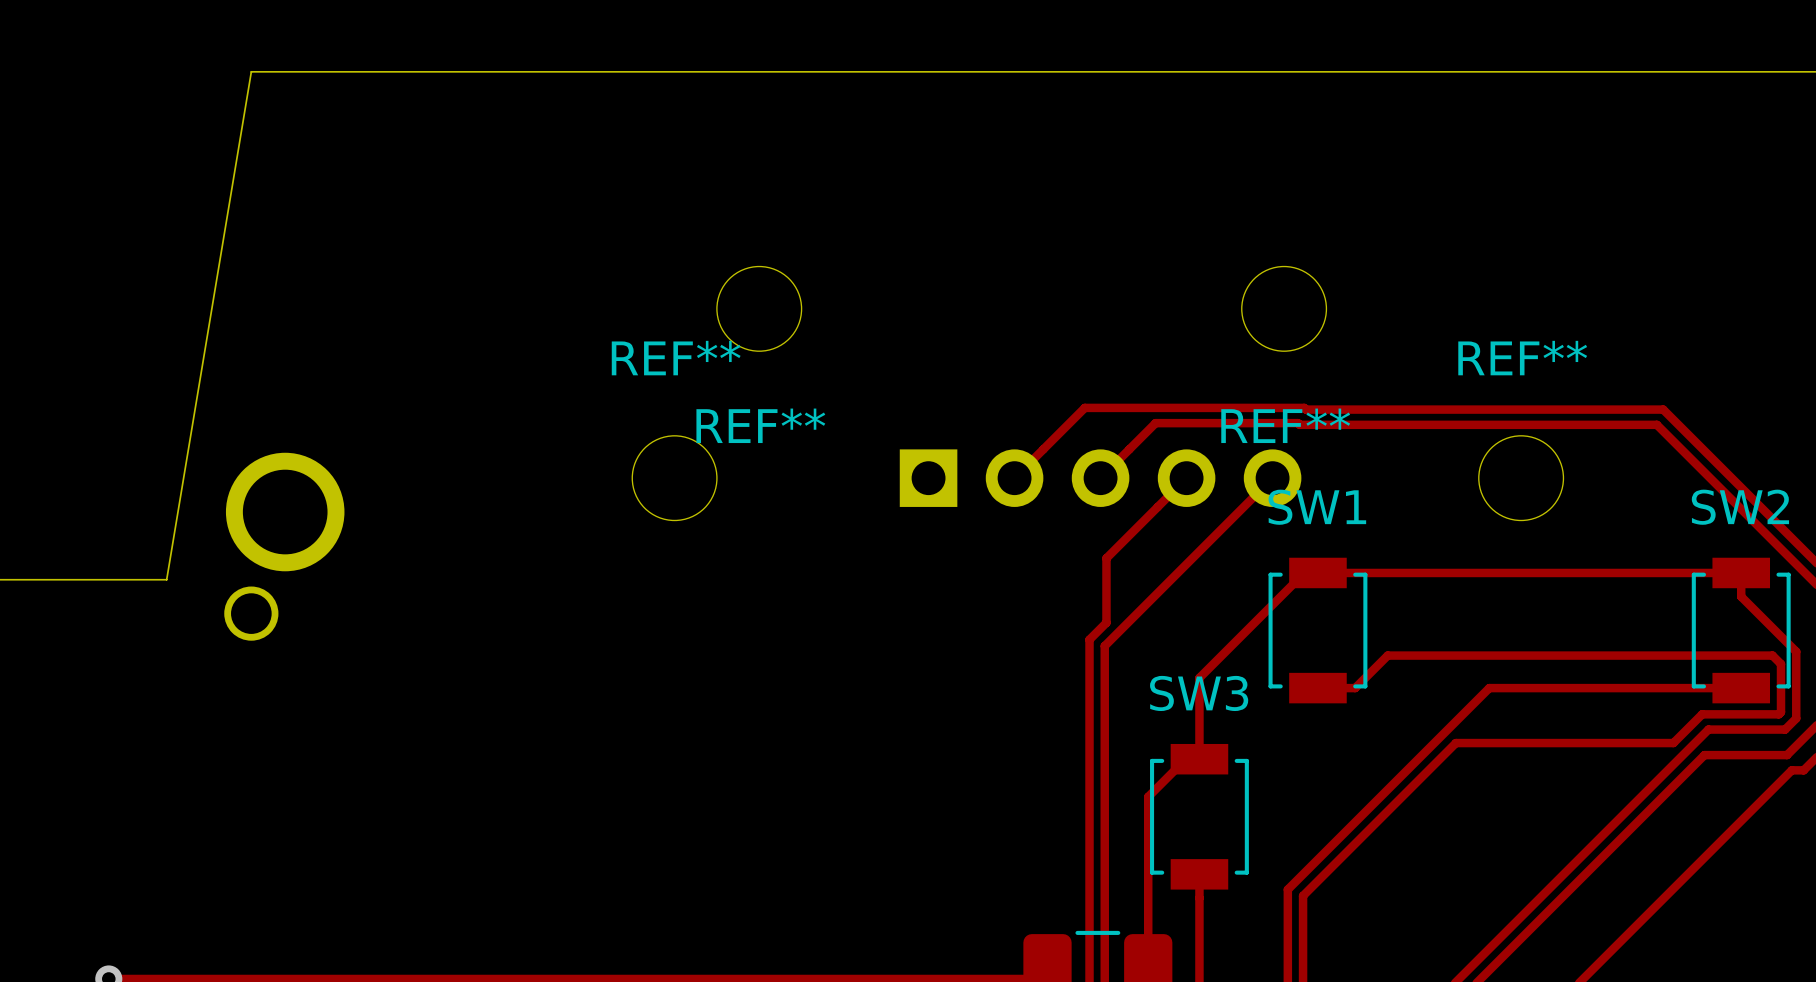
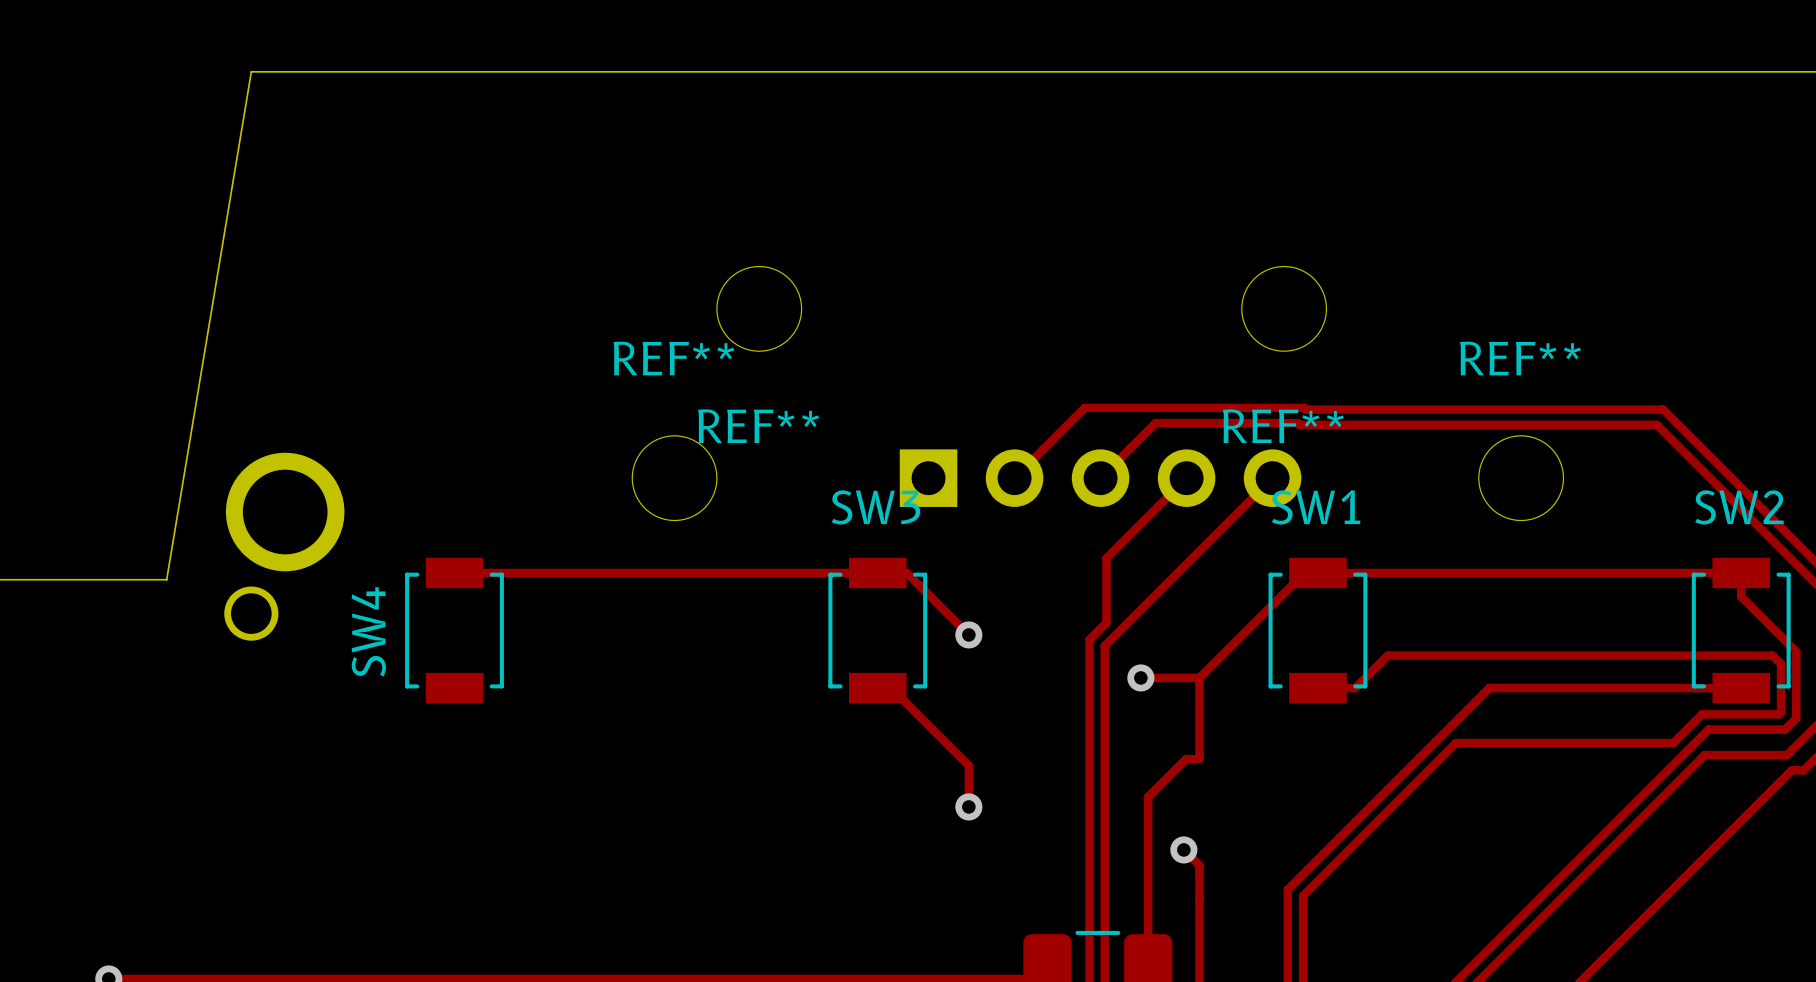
track: none -> (454, 572) (906, 572) (968, 634)
SW4: none -> (454, 630)
via: none -> (968, 634)
track: none -> (1140, 677) (1199, 677)
via: none -> (1140, 677)
track: none -> (877, 688) (891, 688) (968, 765) (968, 806)
via: none -> (968, 806)
SW3 position: (1199, 816) -> (877, 630)
track: none -> (1183, 849) (1199, 865) (1199, 874)
via: none -> (1183, 849)

